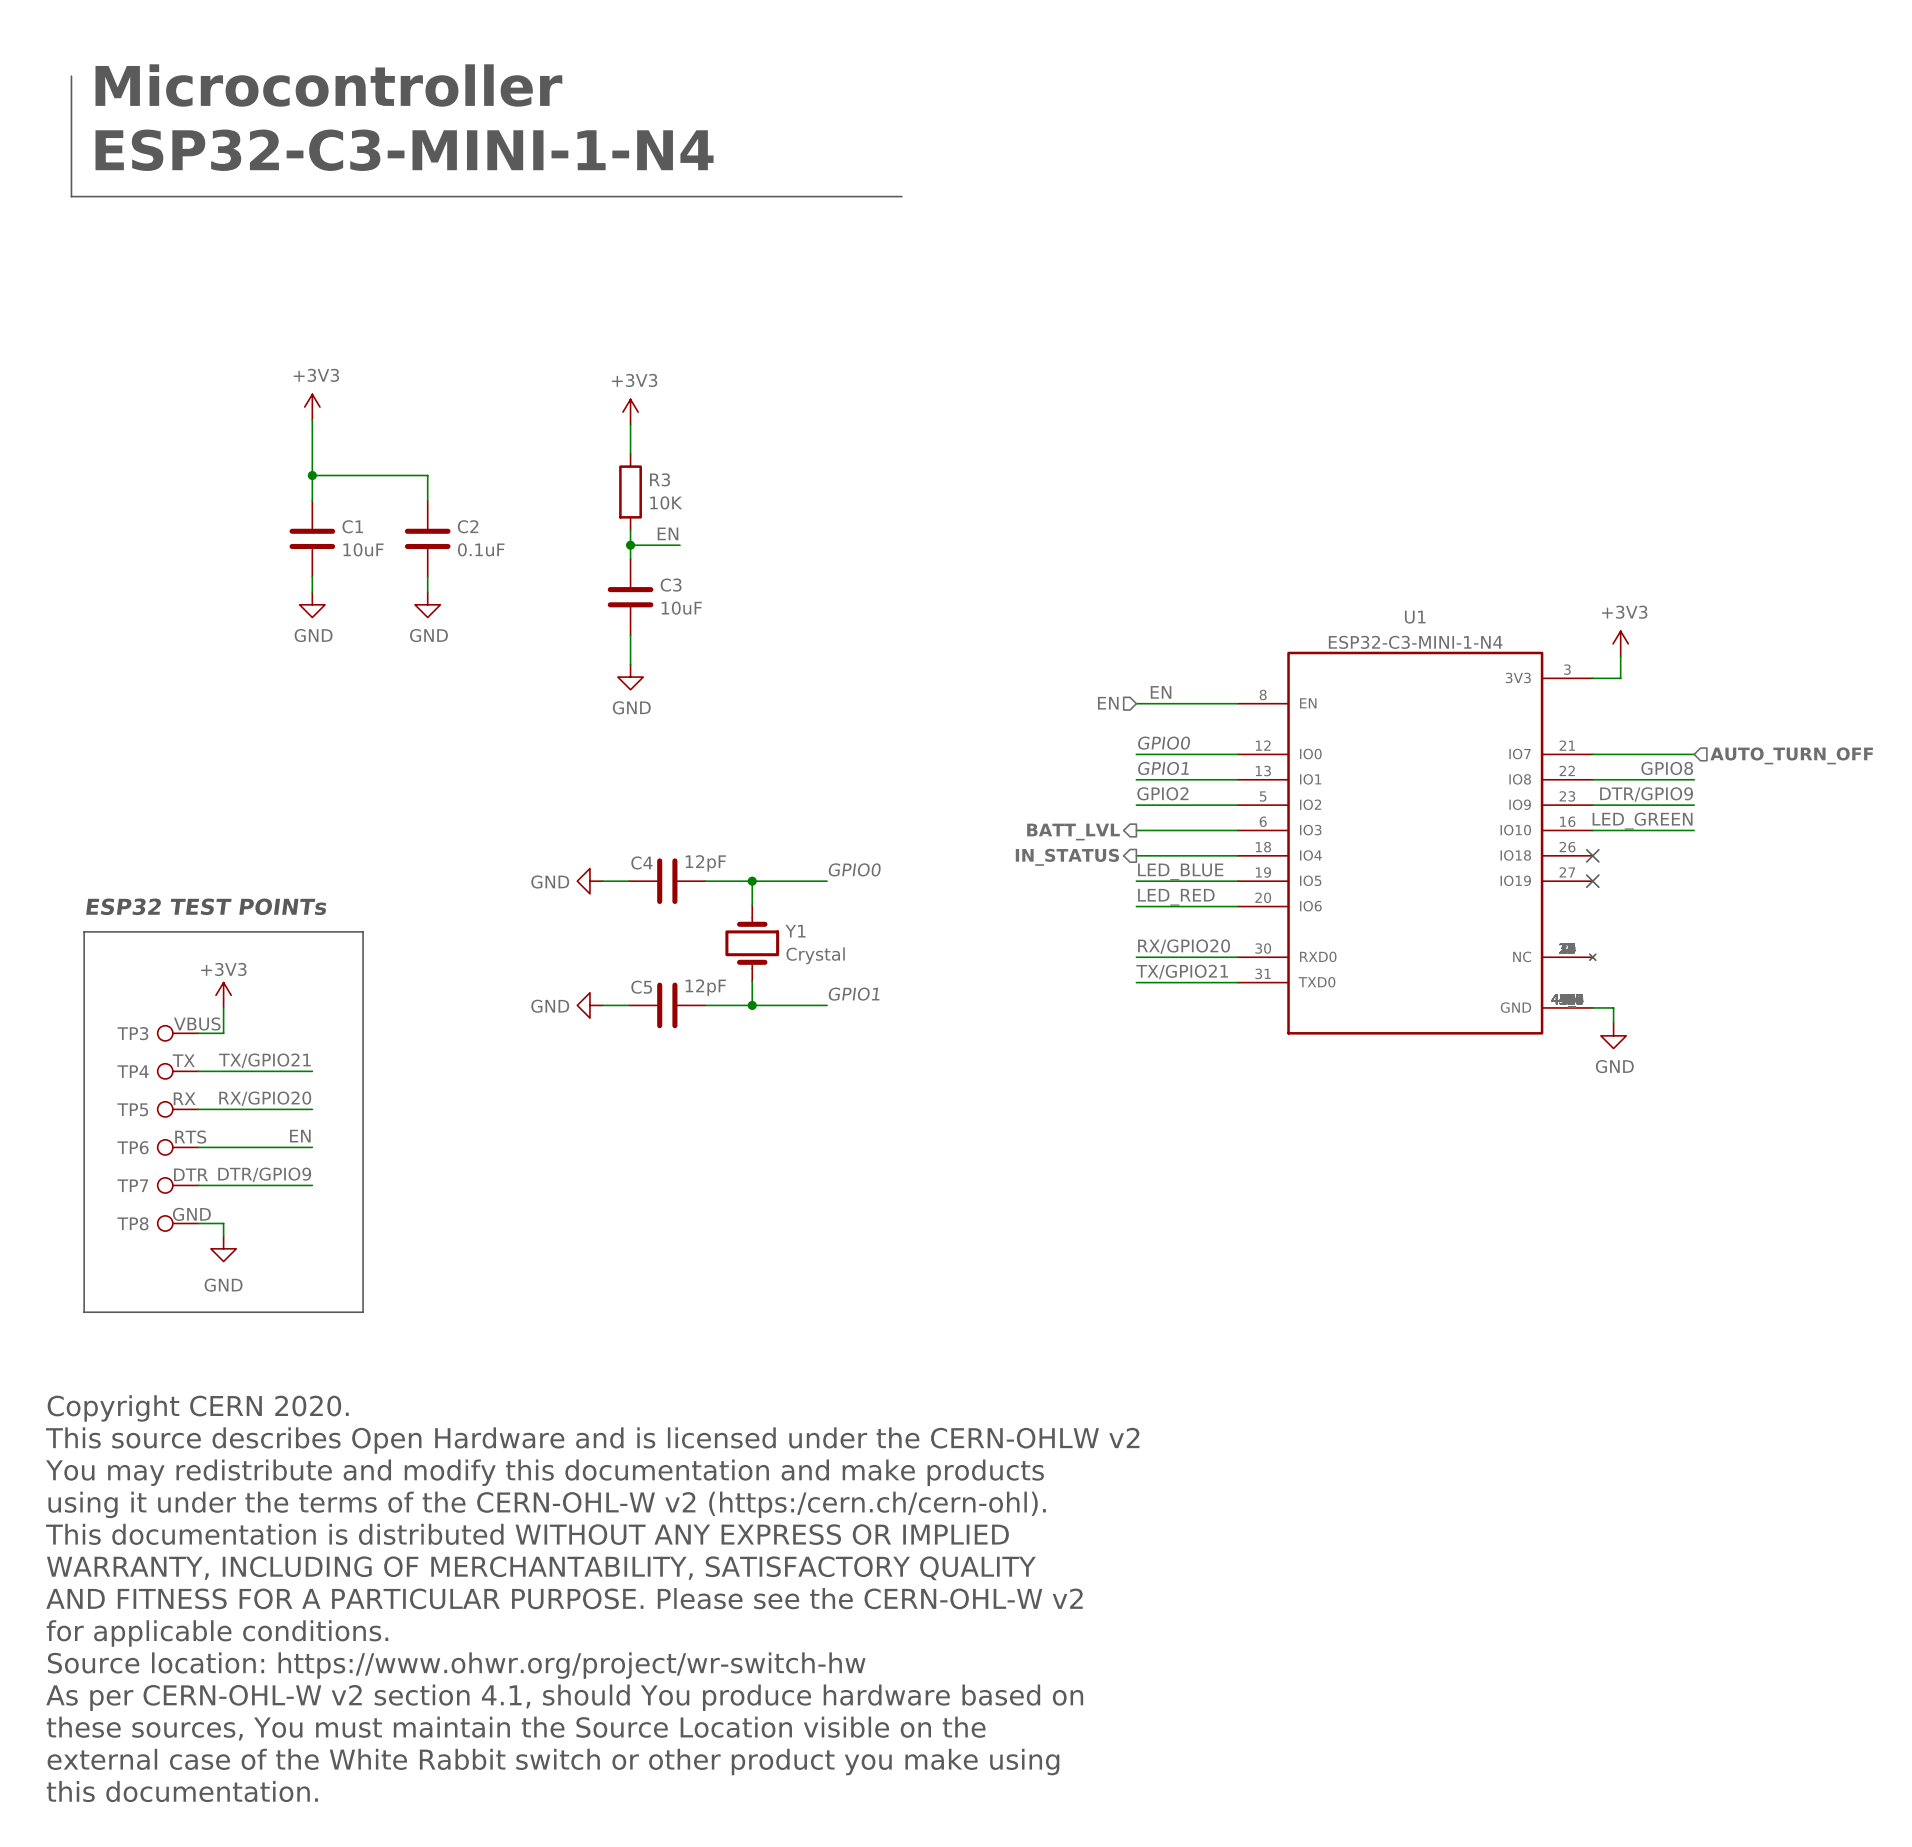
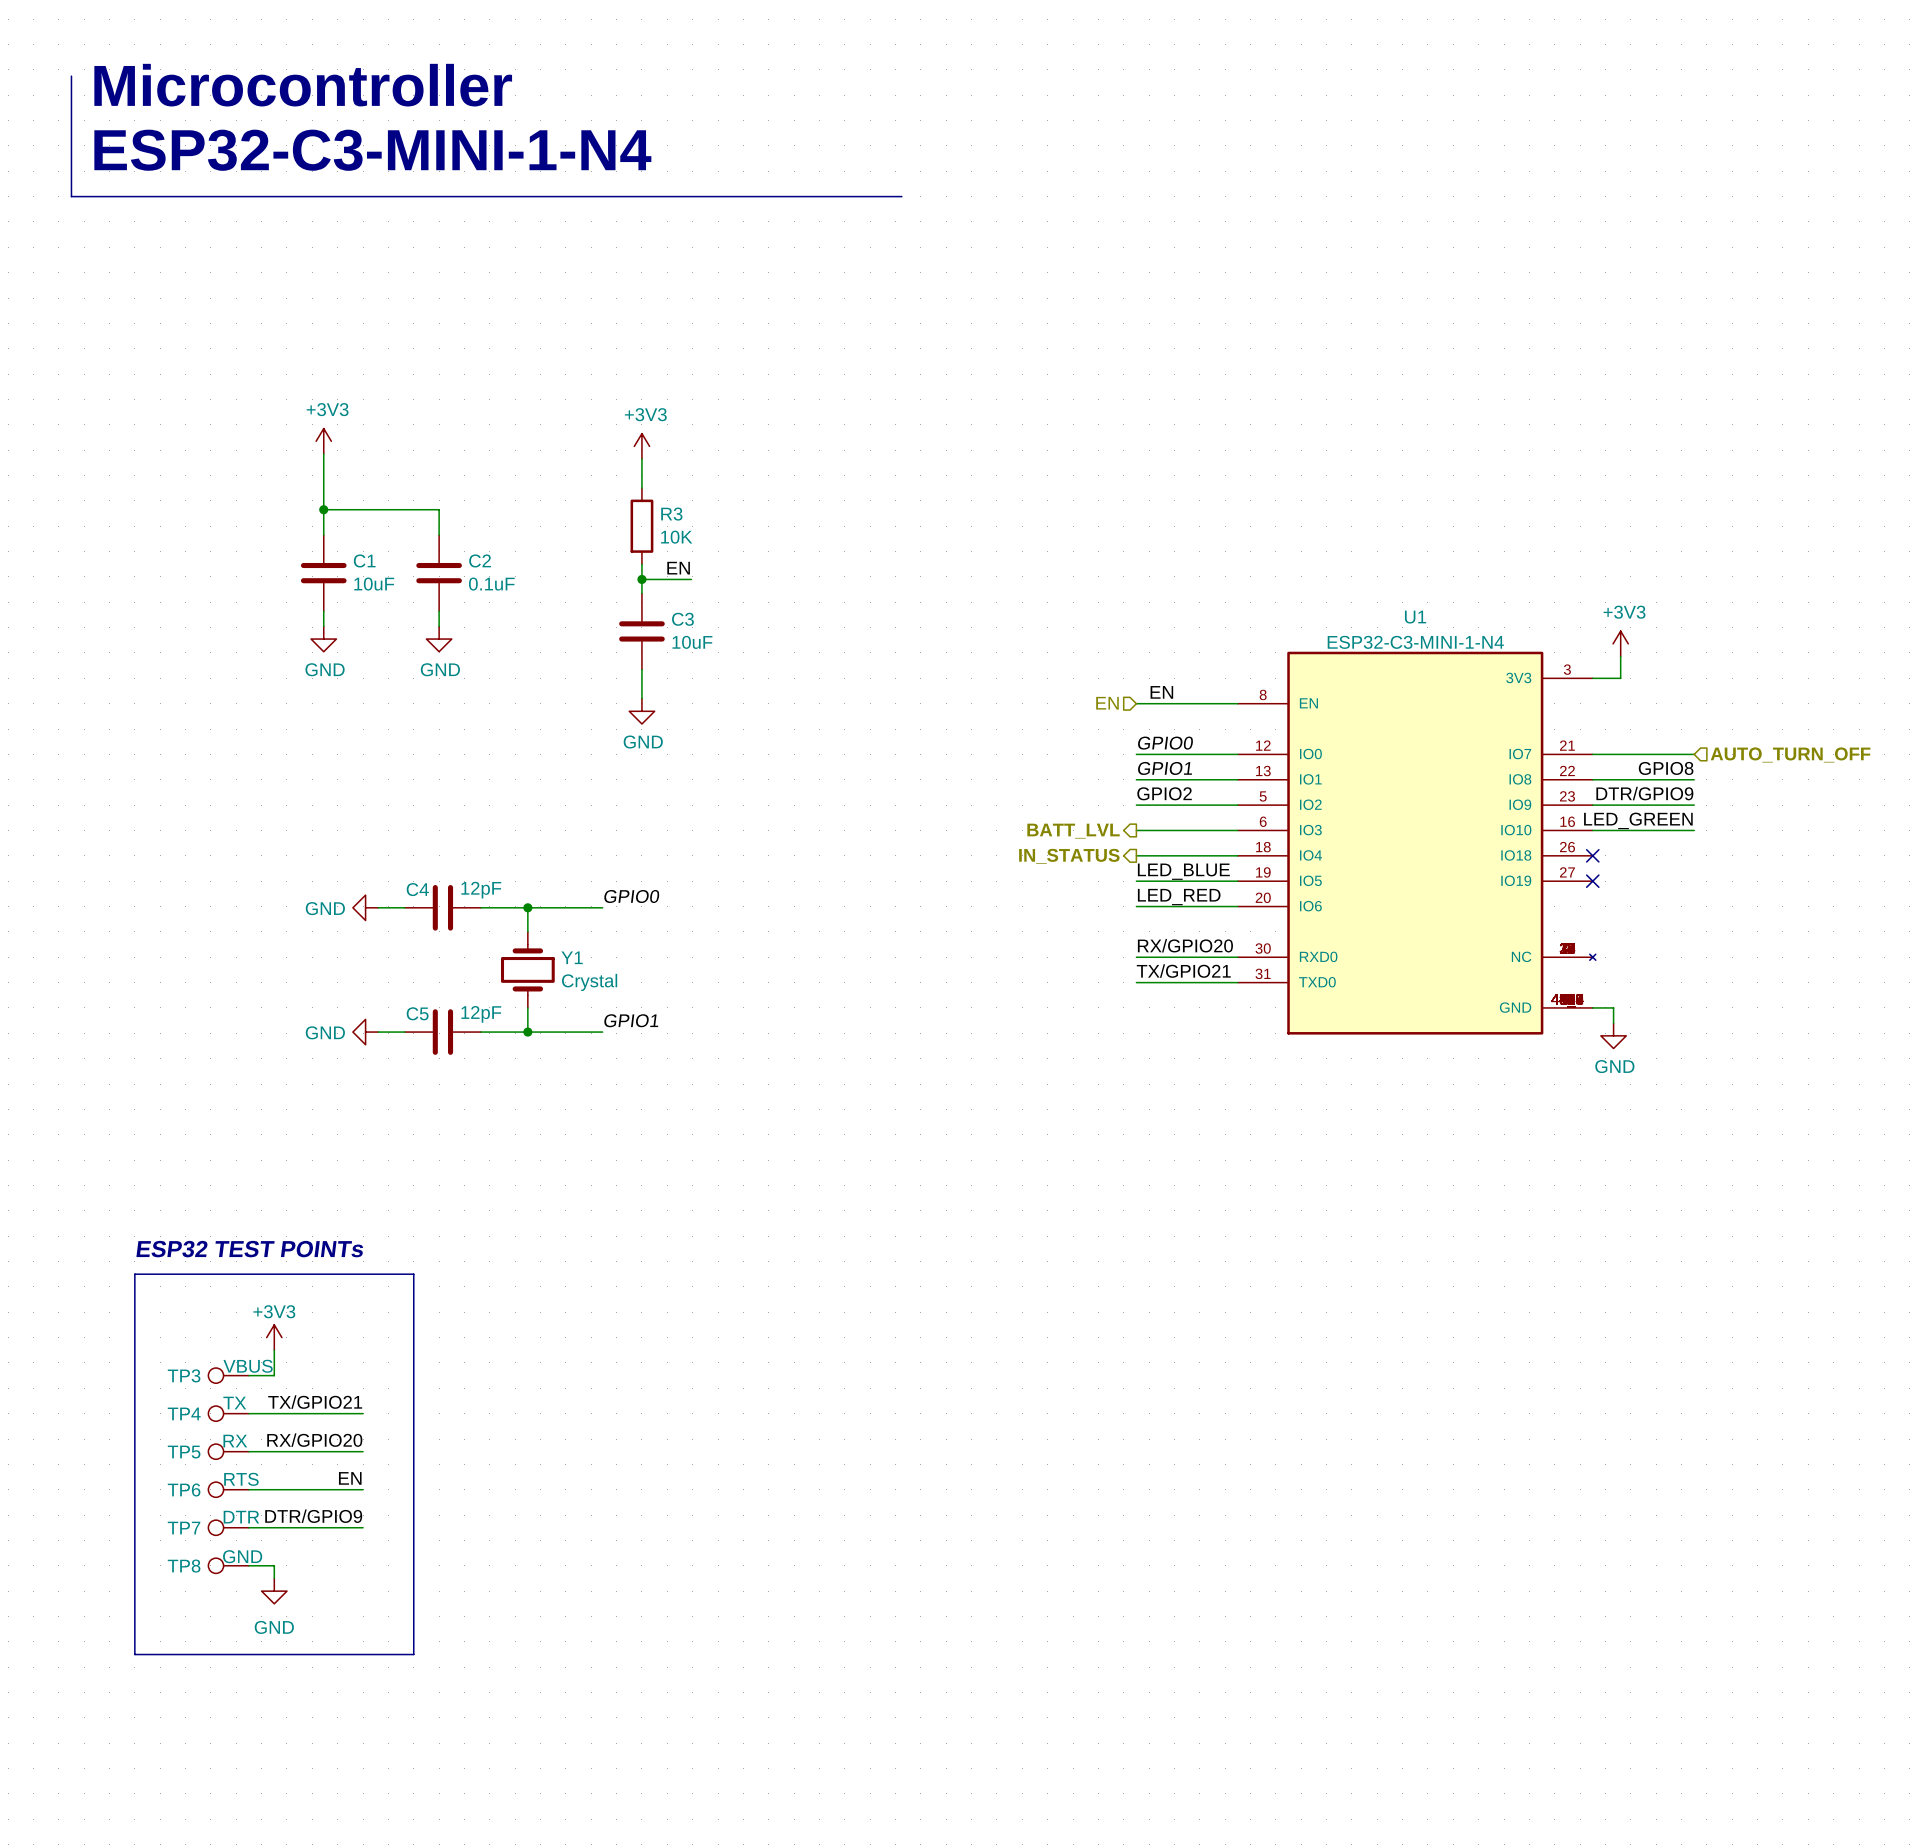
power symbol position: +3V3 (312, 407) -> +3V3 (323, 441)
power symbol position: +3V3 (630, 412) -> +3V3 (641, 446)
wire: (312, 419) (312, 500) -> (323, 453) (323, 535)
wire: (630, 424) (630, 453) -> (641, 459) (641, 488)
wire: (312, 475) (427, 475) (427, 500) -> (323, 509) (439, 509) (439, 535)
junction position: (312, 475) -> (323, 509)
R3 position: (630, 491) -> (641, 526)
wire: (630, 530) (630, 559) -> (641, 564) (641, 593)
label position: EN (667, 533) -> EN (678, 568)
C1 position: (312, 538) -> (323, 573)
C2 position: (427, 538) -> (439, 573)
wire: (630, 545) (679, 545) -> (641, 579) (691, 579)
junction position: (630, 545) -> (641, 579)
wire: (312, 576) (312, 592) -> (323, 611) (323, 626)
wire: (427, 576) (427, 592) -> (439, 611) (439, 626)
C3 position: (630, 597) -> (641, 631)
power symbol position: GND (312, 604) -> GND (323, 639)
power symbol position: GND (427, 604) -> GND (439, 639)
wire: (630, 635) (630, 664) -> (641, 669) (641, 698)
power symbol position: GND (630, 677) -> GND (641, 711)
label position: GPIO0 (854, 869) -> GPIO0 (631, 896)
power symbol: GND (589, 881) -> none
wire: (602, 881) (629, 881) -> (378, 907) (404, 907)
C4 position: (667, 881) -> (442, 907)
wire: (705, 881) (827, 881) -> (480, 907) (602, 907)
wire: (752, 881) (752, 905) -> (527, 907) (527, 931)
junction: (752, 881) -> none
text: ESP32 TEST POINTs (206, 906) -> none
power symbol: none -> GND (365, 907)
junction: none -> (527, 907)
line: (84, 931) (363, 931) (363, 1312) (84, 1312) (84, 931) -> none
Y1 position: (752, 943) -> (527, 969)
wire: (752, 981) (752, 1005) -> (527, 1007) (527, 1032)
label position: GPIO1 (853, 994) -> GPIO1 (631, 1020)
power symbol: +3V3 (223, 995) -> none
power symbol: GND (589, 1005) -> none
wire: (602, 1005) (629, 1005) -> (378, 1032) (404, 1032)
C5 position: (667, 1005) -> (442, 1032)
wire: (705, 1005) (827, 1005) -> (480, 1032) (602, 1032)
junction: (752, 1005) -> none
wire: (223, 1007) (223, 1033) (198, 1033) -> none
power symbol: none -> GND (365, 1032)
junction: none -> (527, 1032)
TP3 position: (177, 1033) -> (228, 1375)
label: TX/GPIO21 (264, 1060) -> none
TP4 position: (177, 1071) -> (228, 1413)
wire: (198, 1071) (312, 1071) -> none
label: RX/GPIO20 (265, 1098) -> none
TP5 position: (177, 1109) -> (228, 1451)
wire: (198, 1109) (312, 1109) -> none
label: EN (300, 1136) -> none
TP6 position: (177, 1147) -> (228, 1489)
wire: (198, 1147) (312, 1147) -> none
label: DTR/GPIO9 (264, 1174) -> none
TP7 position: (177, 1185) -> (228, 1527)
wire: (198, 1185) (312, 1185) -> (248, 1413) (363, 1413)
TP8 position: (177, 1223) -> (228, 1565)
wire: (198, 1223) (223, 1223) (223, 1236) -> none
power symbol: GND (223, 1248) -> none
text: none -> ESP32 TEST POINTs (249, 1249)
line: none -> (134, 1274) (413, 1274) (413, 1654) (134, 1654) (134, 1274)
power symbol: none -> +3V3 (274, 1337)
wire: none -> (274, 1350) (274, 1375) (248, 1375)
label: none -> TX/GPIO21 (315, 1402)
text: Copyright CERN 2020. (198, 1408) -> none
text: This source describes Open Hardware and is licensed under the CERN-OHLW v2 (592, 1440) -> none
label: none -> RX/GPIO20 (314, 1440)
wire: none -> (248, 1451) (363, 1451)
text: You may redistribute and modify this documentation and make products (544, 1472) -> none
label: none -> EN (350, 1478)
wire: none -> (248, 1489) (363, 1489)
text: using it under the terms of the CERN-OHL-W v2 (https:/cern.ch/cern-ohl). (547, 1504) -> none
label: none -> DTR/GPIO9 (313, 1516)
wire: none -> (248, 1527) (363, 1527)
text: This documentation is distributed WITHOUT ANY EXPRESS OR IMPLIED (527, 1534) -> none
wire: none -> (248, 1565) (274, 1565) (274, 1578)
text: WARRANTY, INCLUDING OF MERCHANTABILITY, SATISFACTORY QUALITY (541, 1568) -> none
power symbol: none -> GND (274, 1591)
text: AND FITNESS FOR A PARTICULAR PURPOSE. Please see the CERN-OHL-W v2 (564, 1598) -> none
text: for applicable conditions. (217, 1633) -> none
text: Source location: https://www.ohwr.org/project/wr-switch-hw (456, 1665) -> none
text: As per CERN-OHL-W v2 section 4.1, should You produce hardware based on (564, 1697) -> none
text: these sources, You must maintain the Source Location visible on the (516, 1728) -> none
text: external case of the White Rabbit switch or other product you make using (553, 1762) -> none
text: this documentation. (182, 1791) -> none

